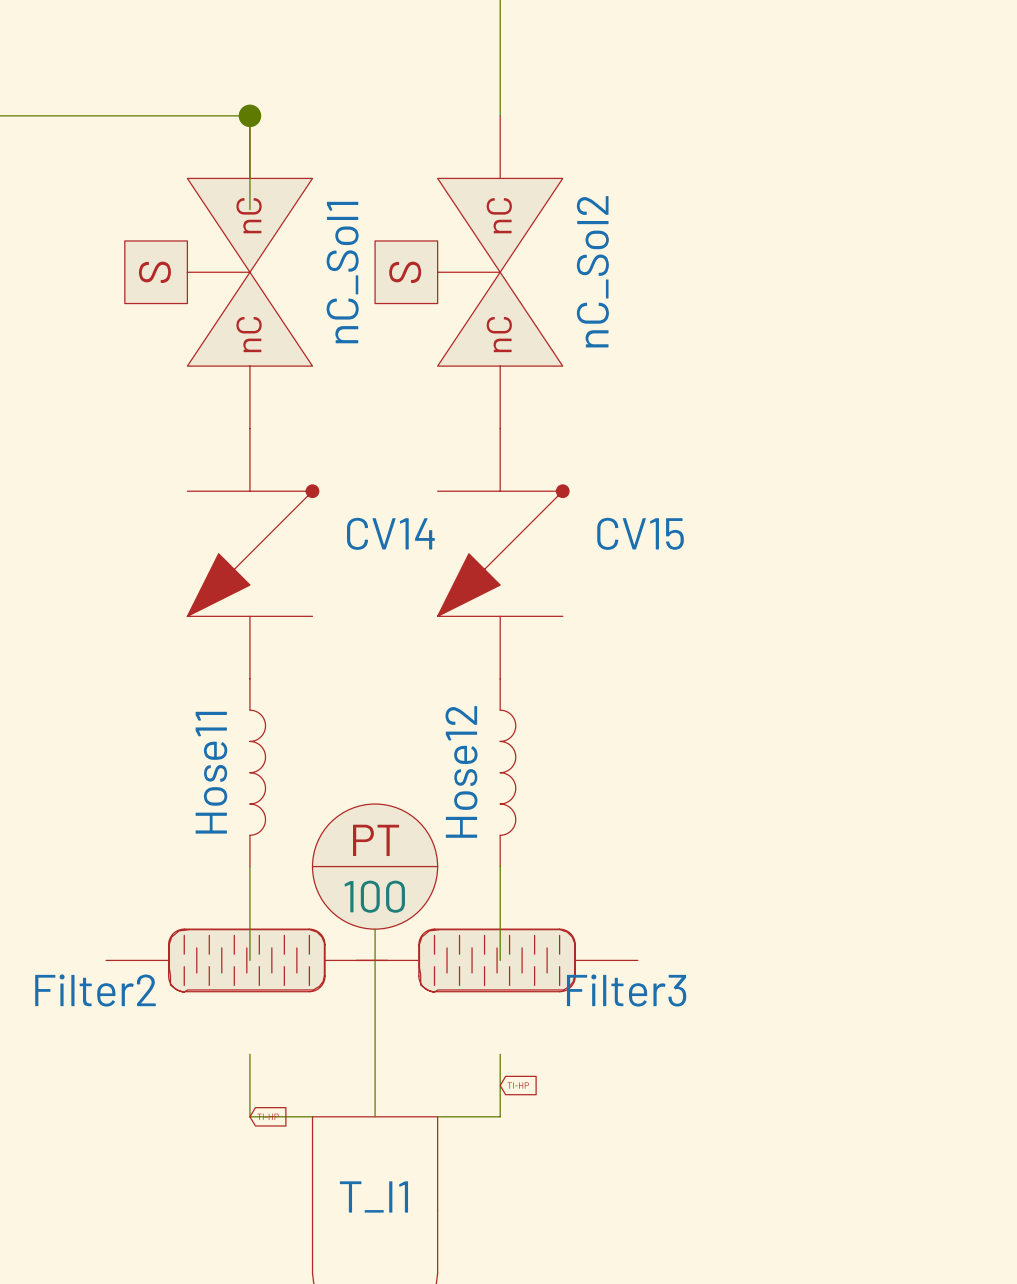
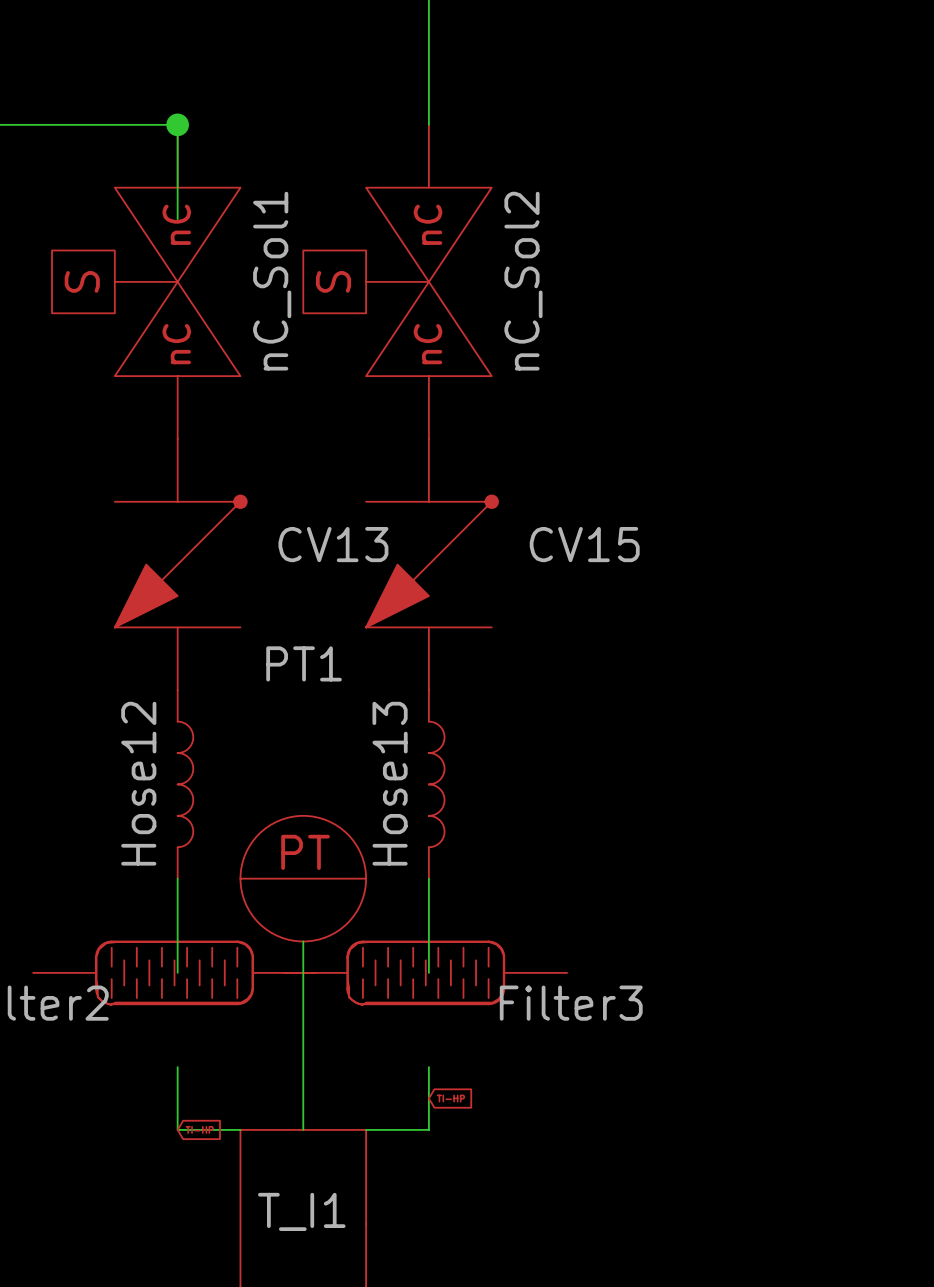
CV14 name: CV14 (390, 533) -> CV13 (333, 544)
PT1 name: none -> PT1 (304, 663)
Hose12 name: Hose12 (461, 771) -> Hose13 (390, 783)
Hose11 name: Hose11 (211, 772) -> Hose12 (138, 783)
PT1 value: 100 (374, 896) -> none

